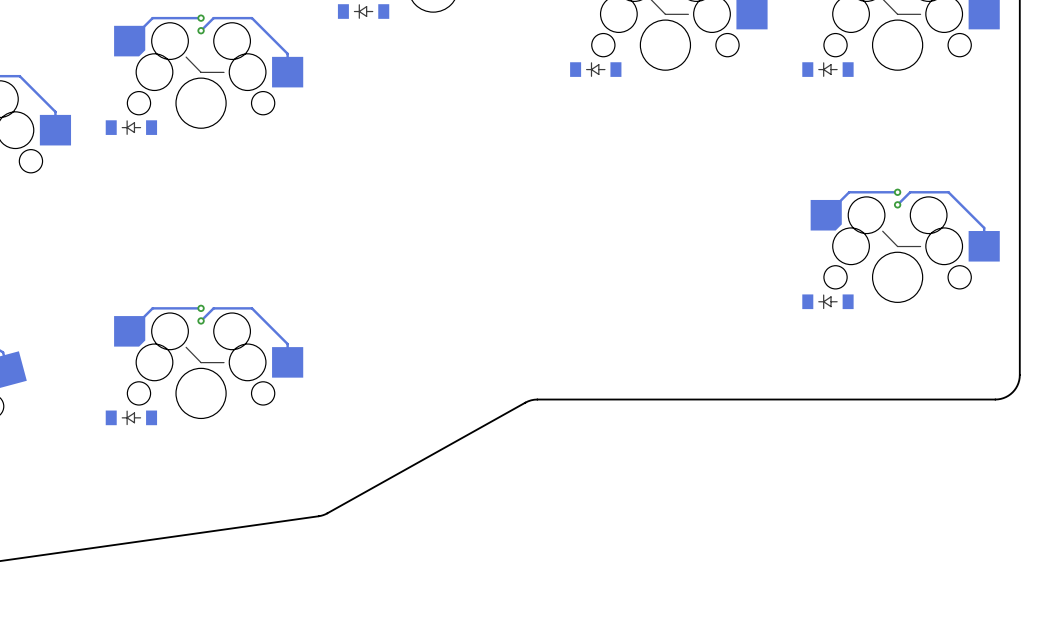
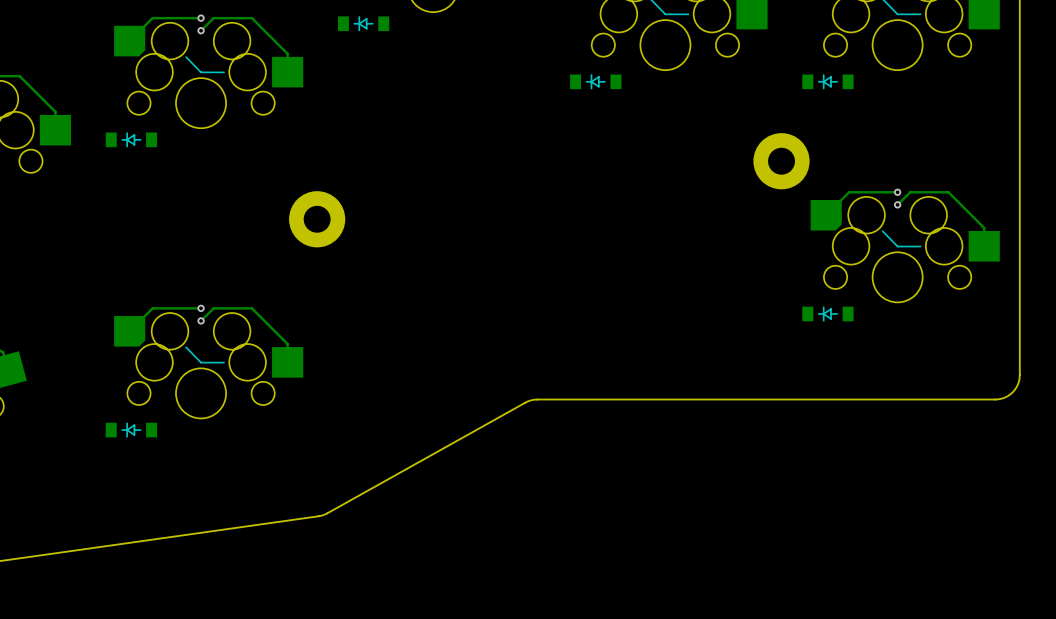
part position: (363, 11) -> (363, 23)
part position: (595, 69) -> (595, 81)
part position: (827, 69) -> (827, 81)
part position: (131, 127) -> (131, 139)
part: none -> (781, 161)
part: none -> (317, 219)
part position: (827, 301) -> (827, 313)
part position: (131, 417) -> (131, 430)

